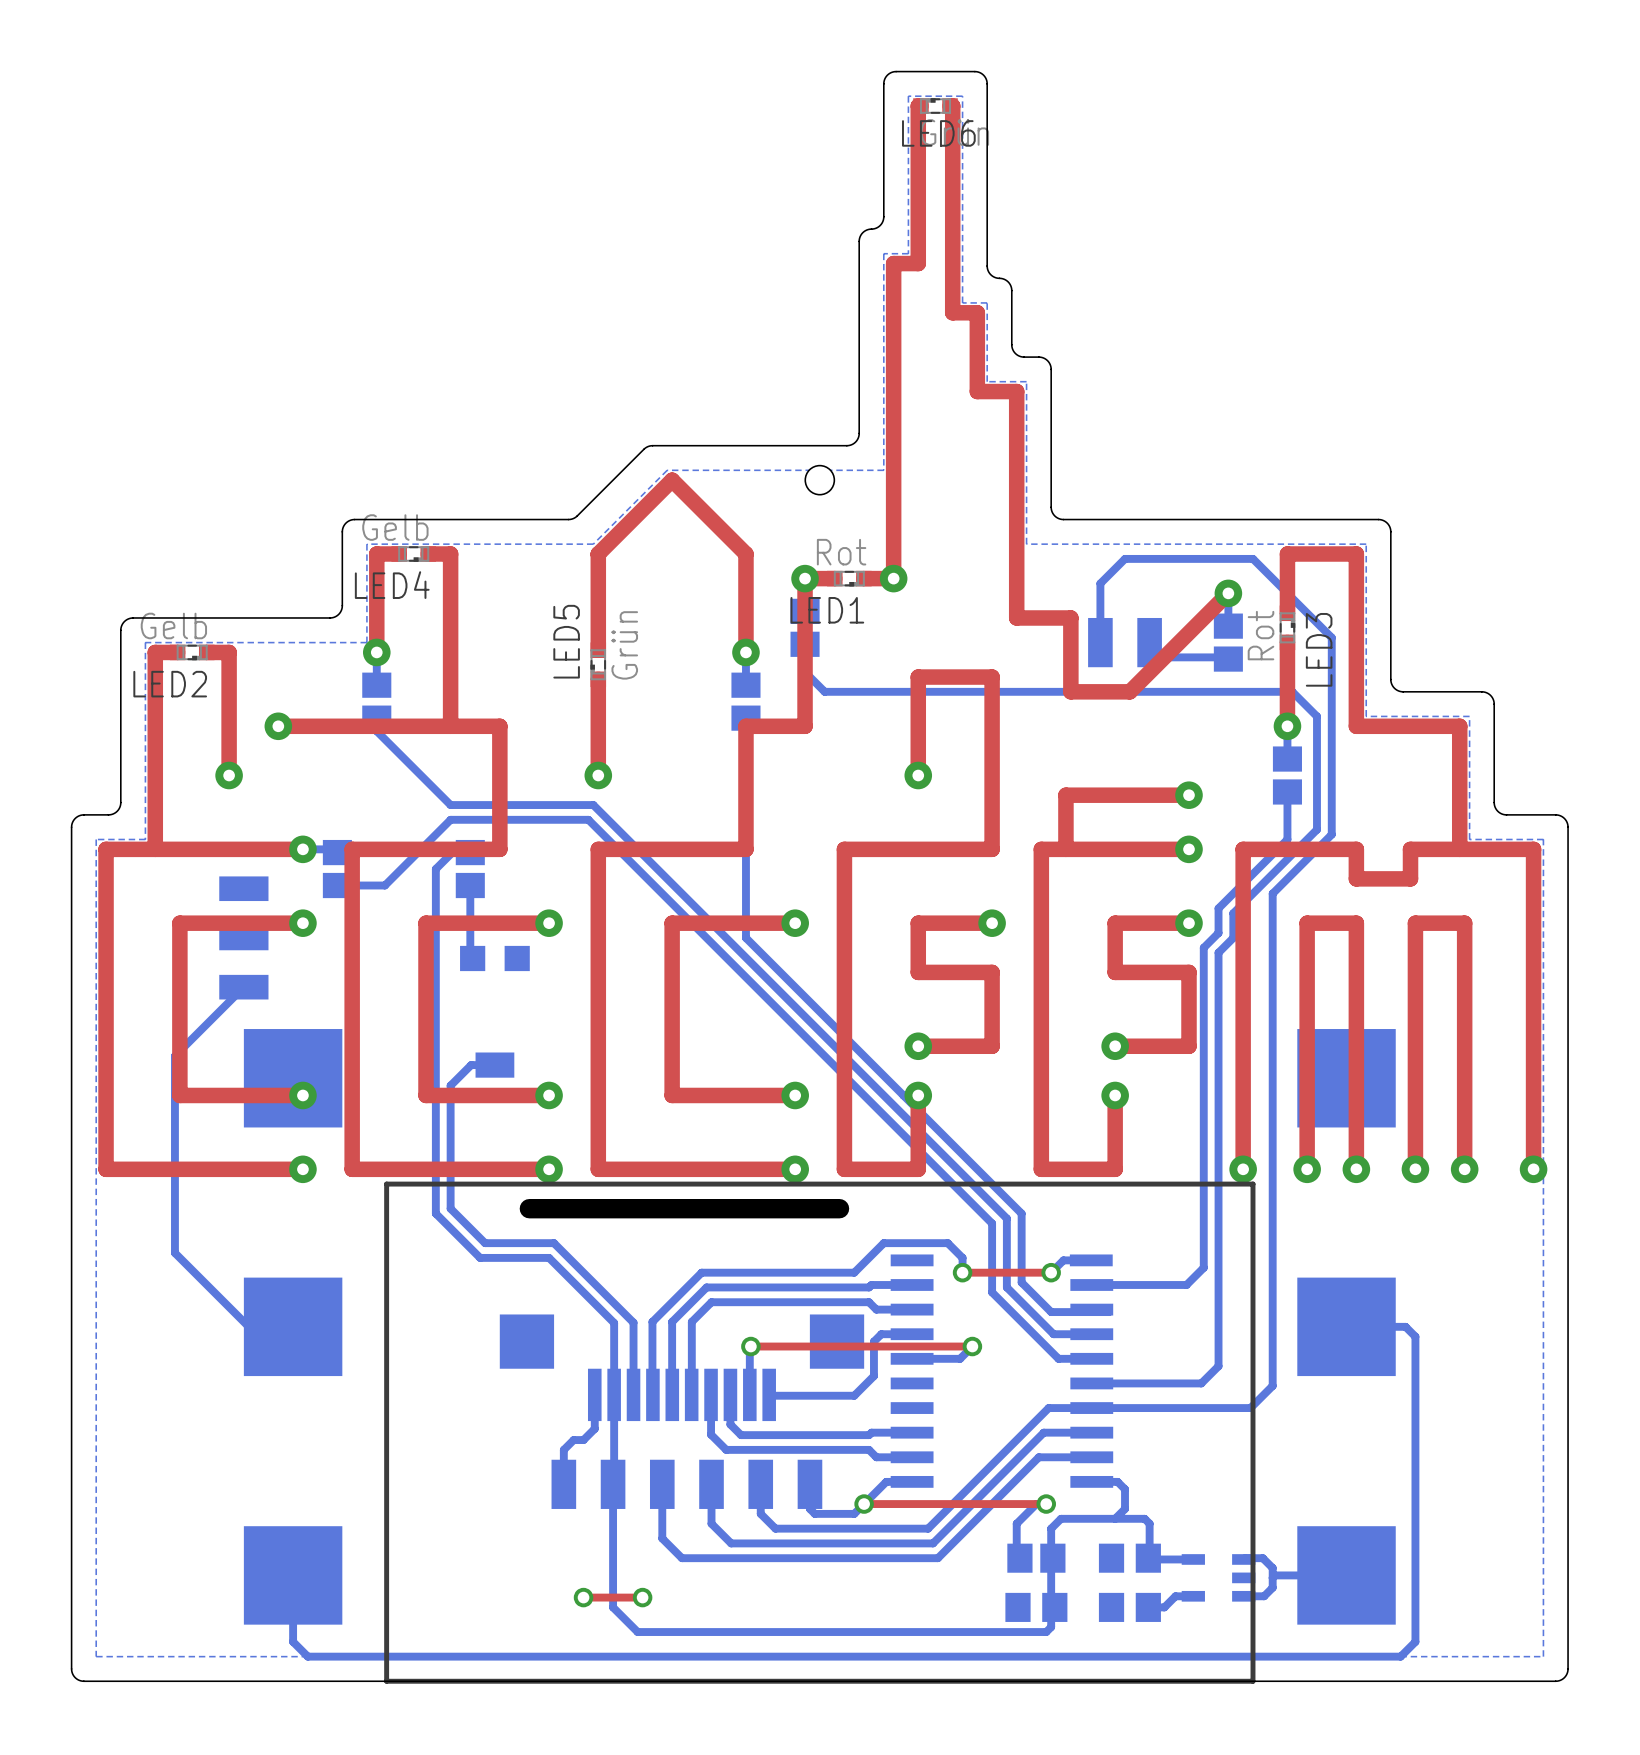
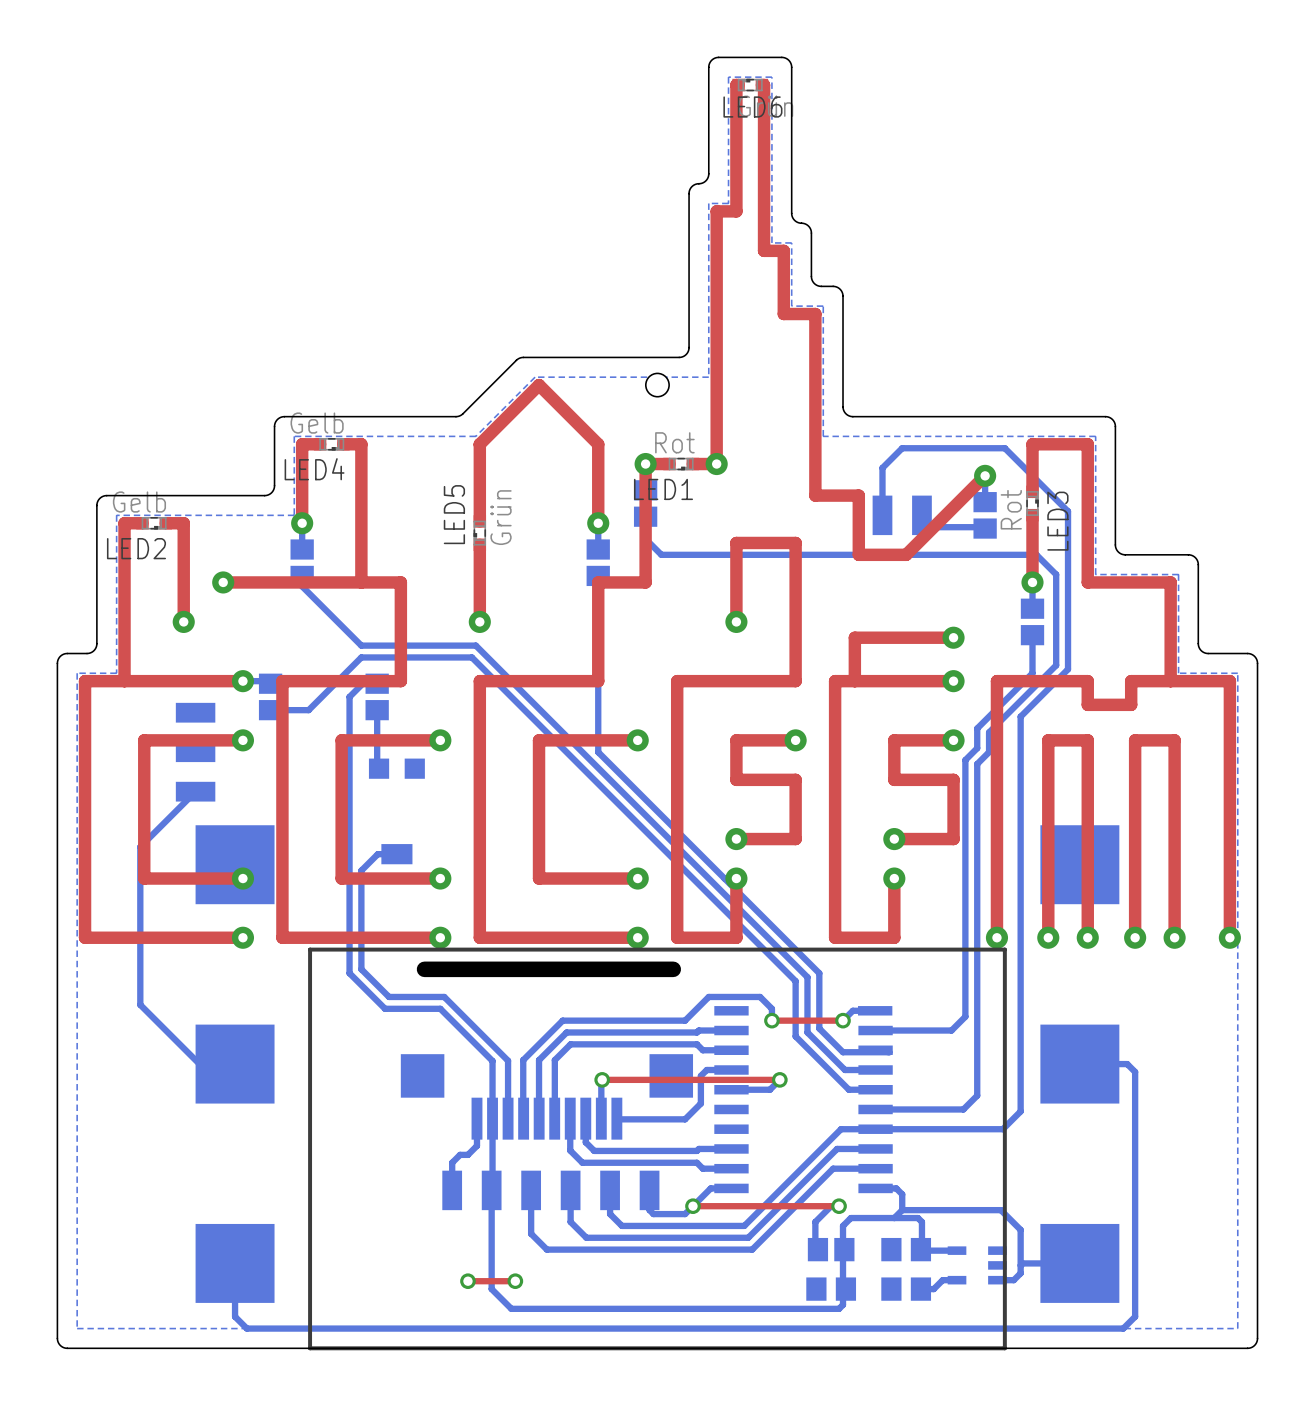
bottom track: (1243, 1559) (1262, 1558) (1272, 1568) -> (902, 1210) (1000, 1210) (1020, 1229) (1020, 1257)

